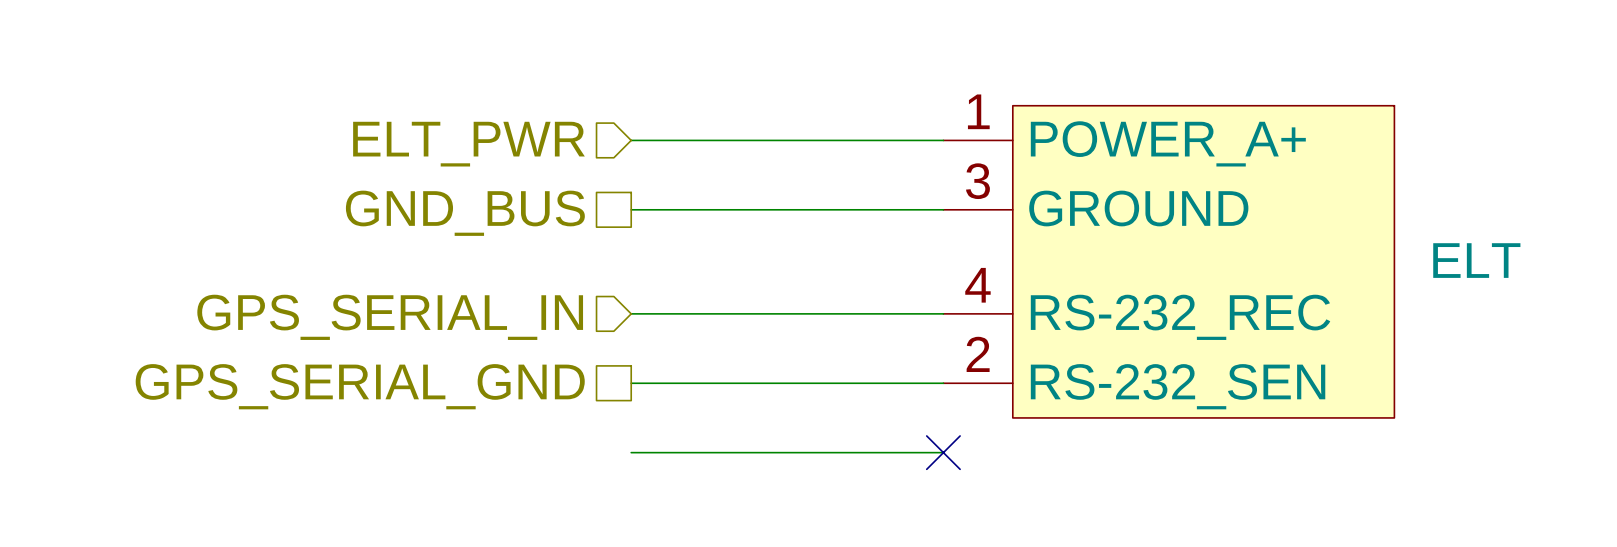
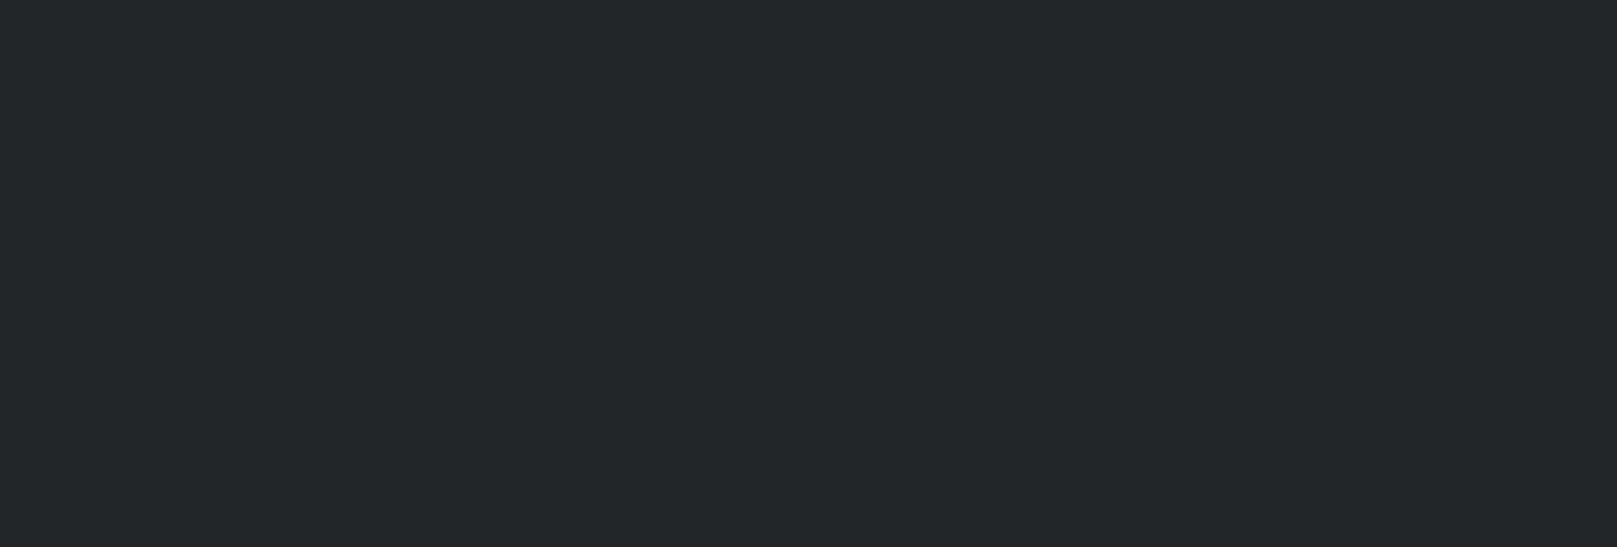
wire: (631, 140) (943, 140) -> none
hierarchical label: ELT_PWR (468, 144) -> none
wire: (631, 209) (943, 209) -> none
hierarchical label: GND_BUS (465, 213) -> none
ELT: (1168, 261) -> none
wire: (631, 313) (943, 313) -> none
hierarchical label: GPS_SERIAL_IN (390, 317) -> none
wire: (631, 383) (943, 383) -> none
hierarchical label: GPS_SERIAL_GND (360, 386) -> none
wire: (631, 452) (943, 452) -> none
no-connect mark: (943, 452) -> none

